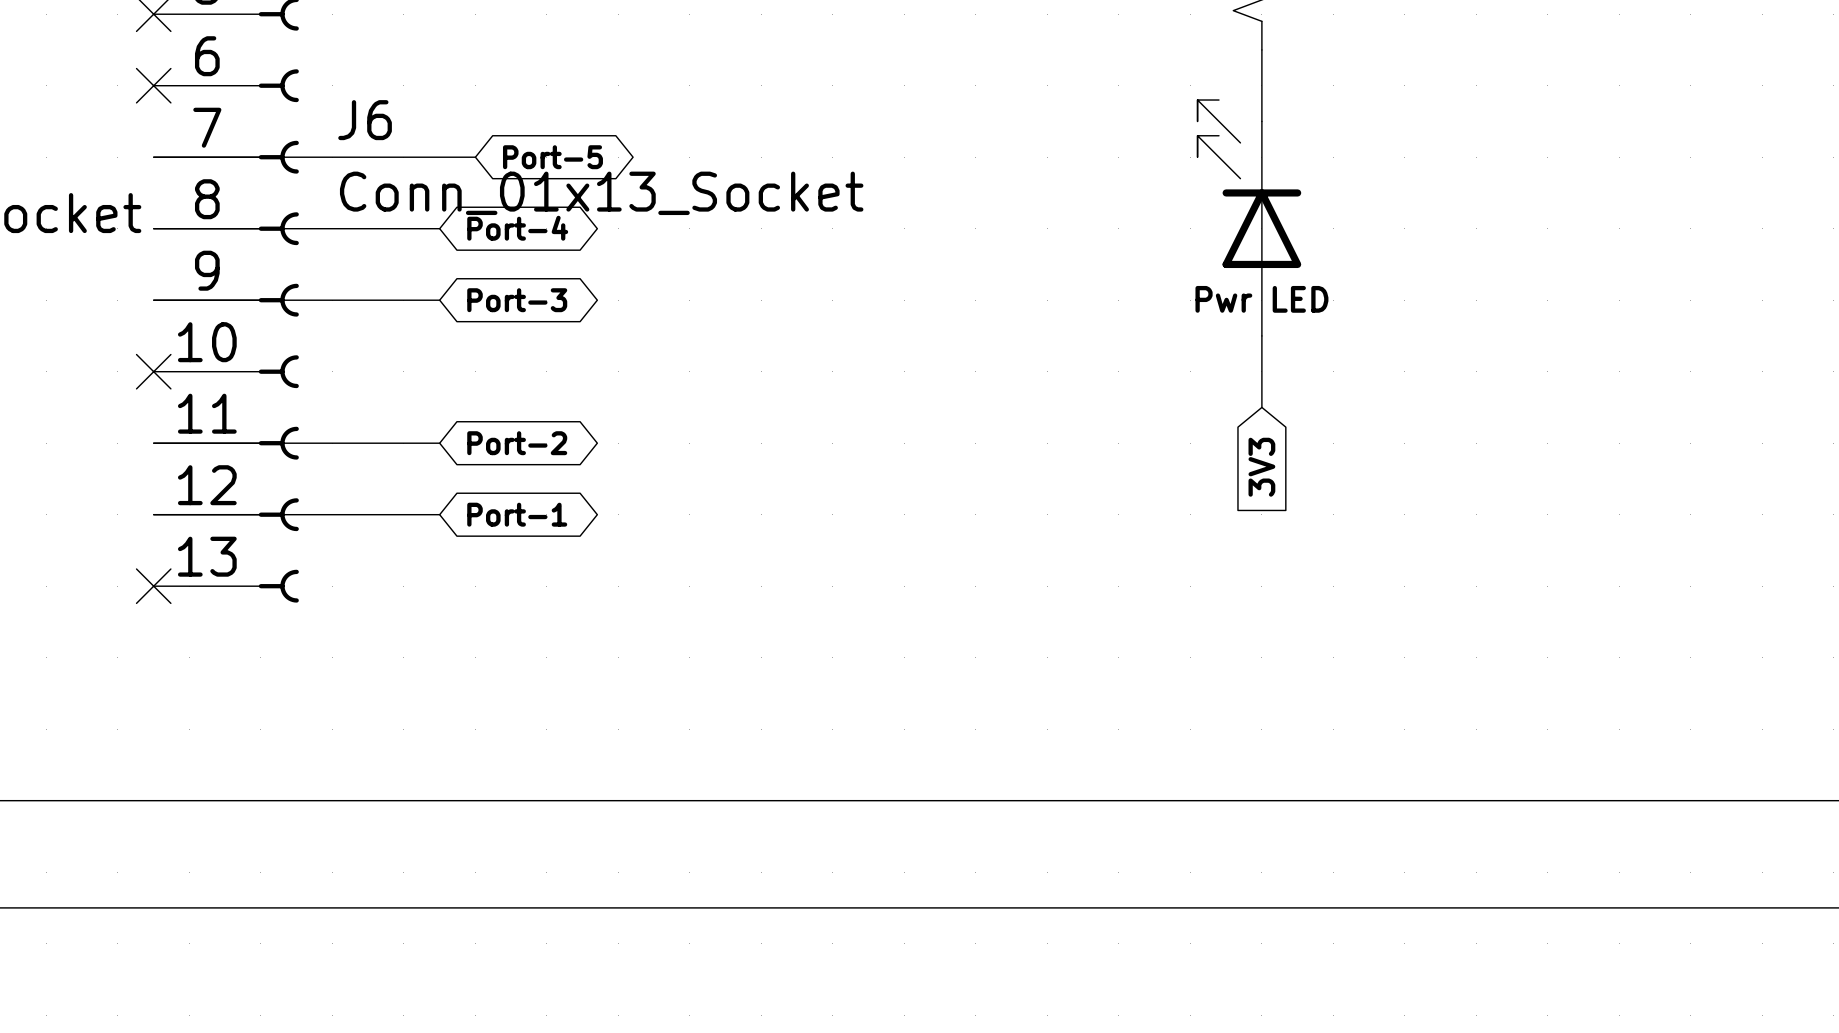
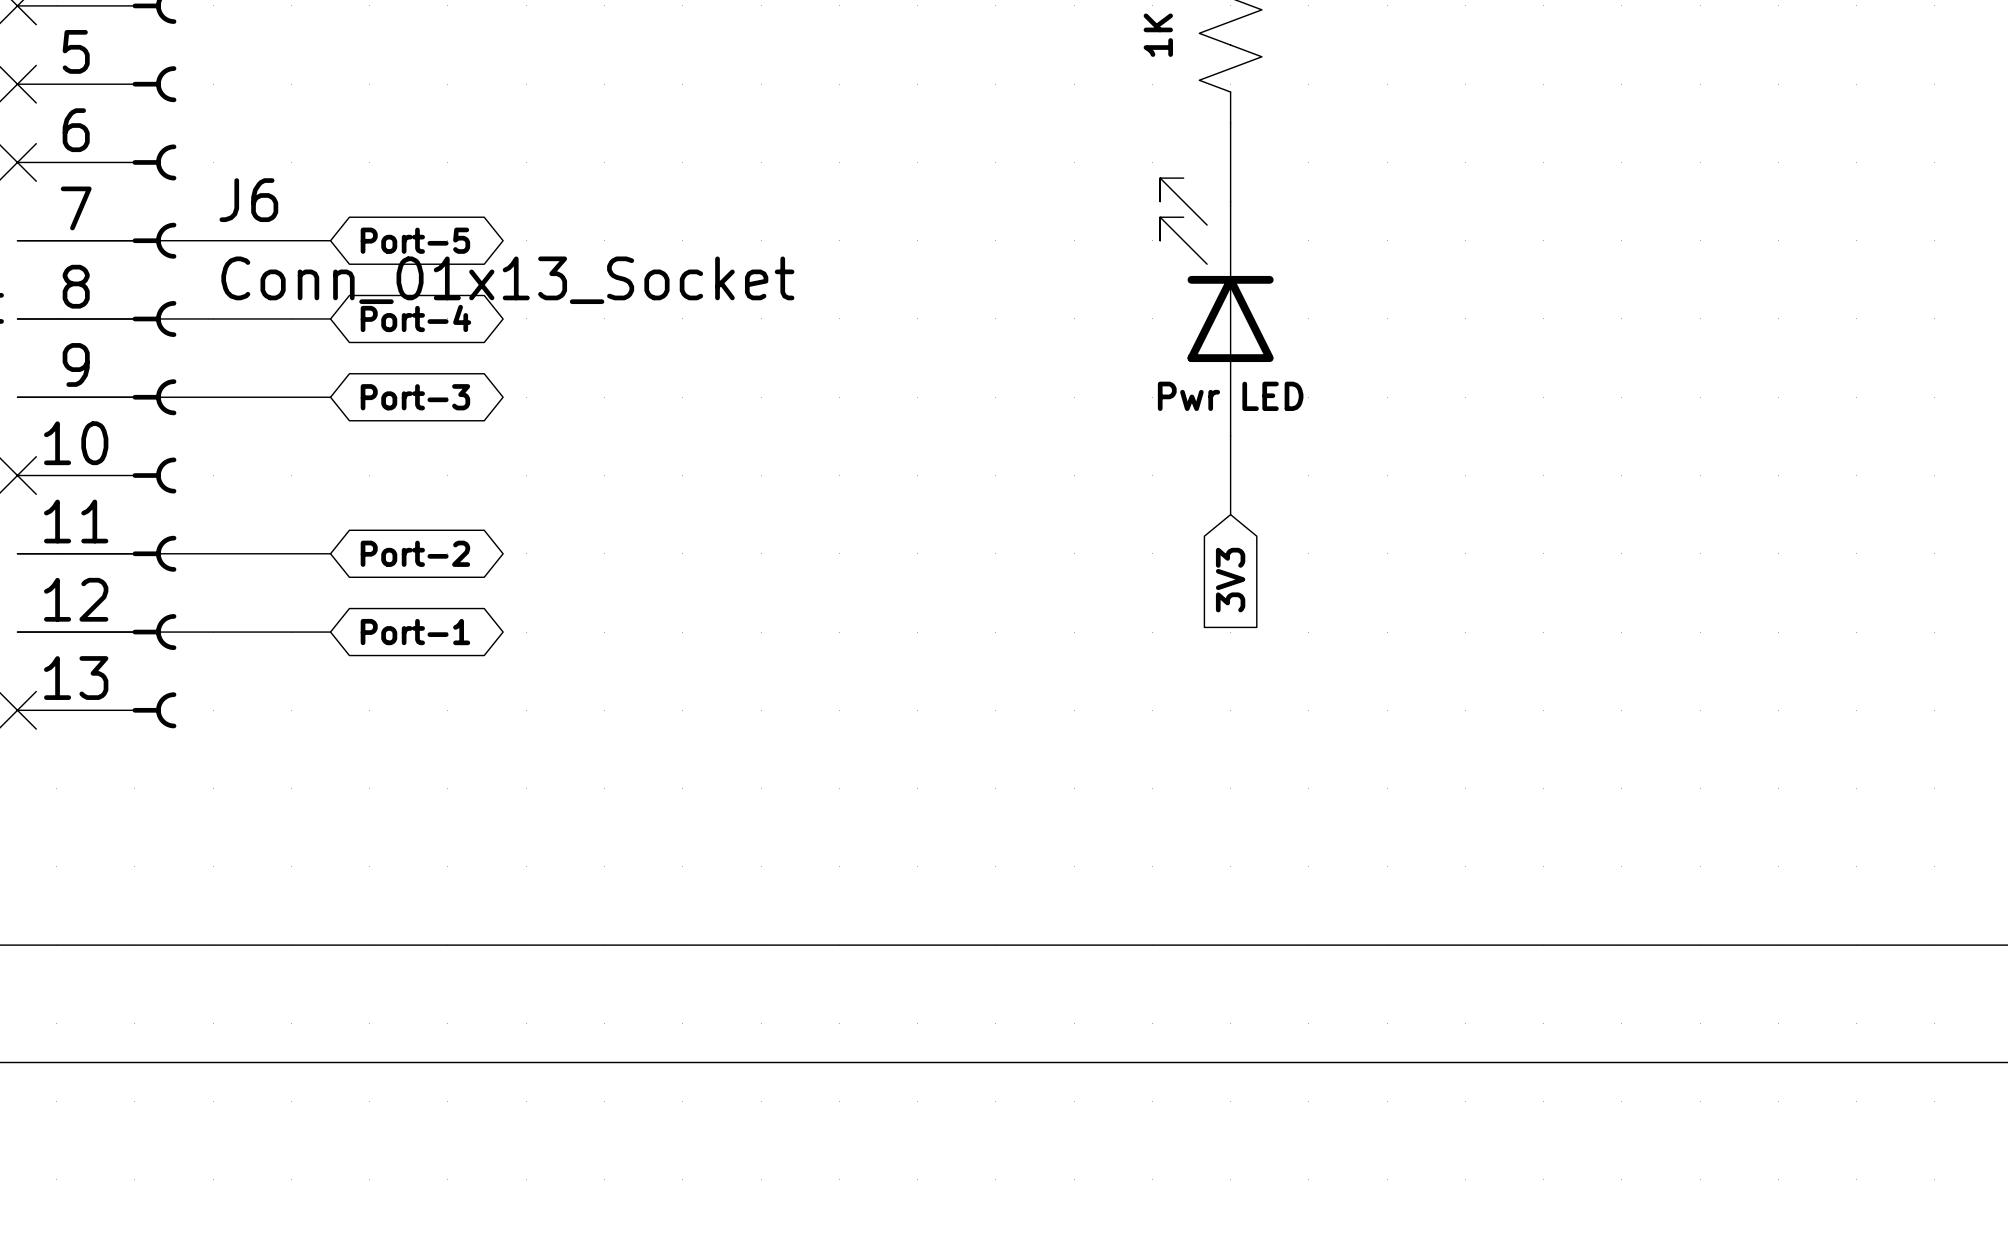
wire: (439, 157) (475, 157) -> none
global label position: Port-5 (552, 157) -> Port-5 (415, 240)

